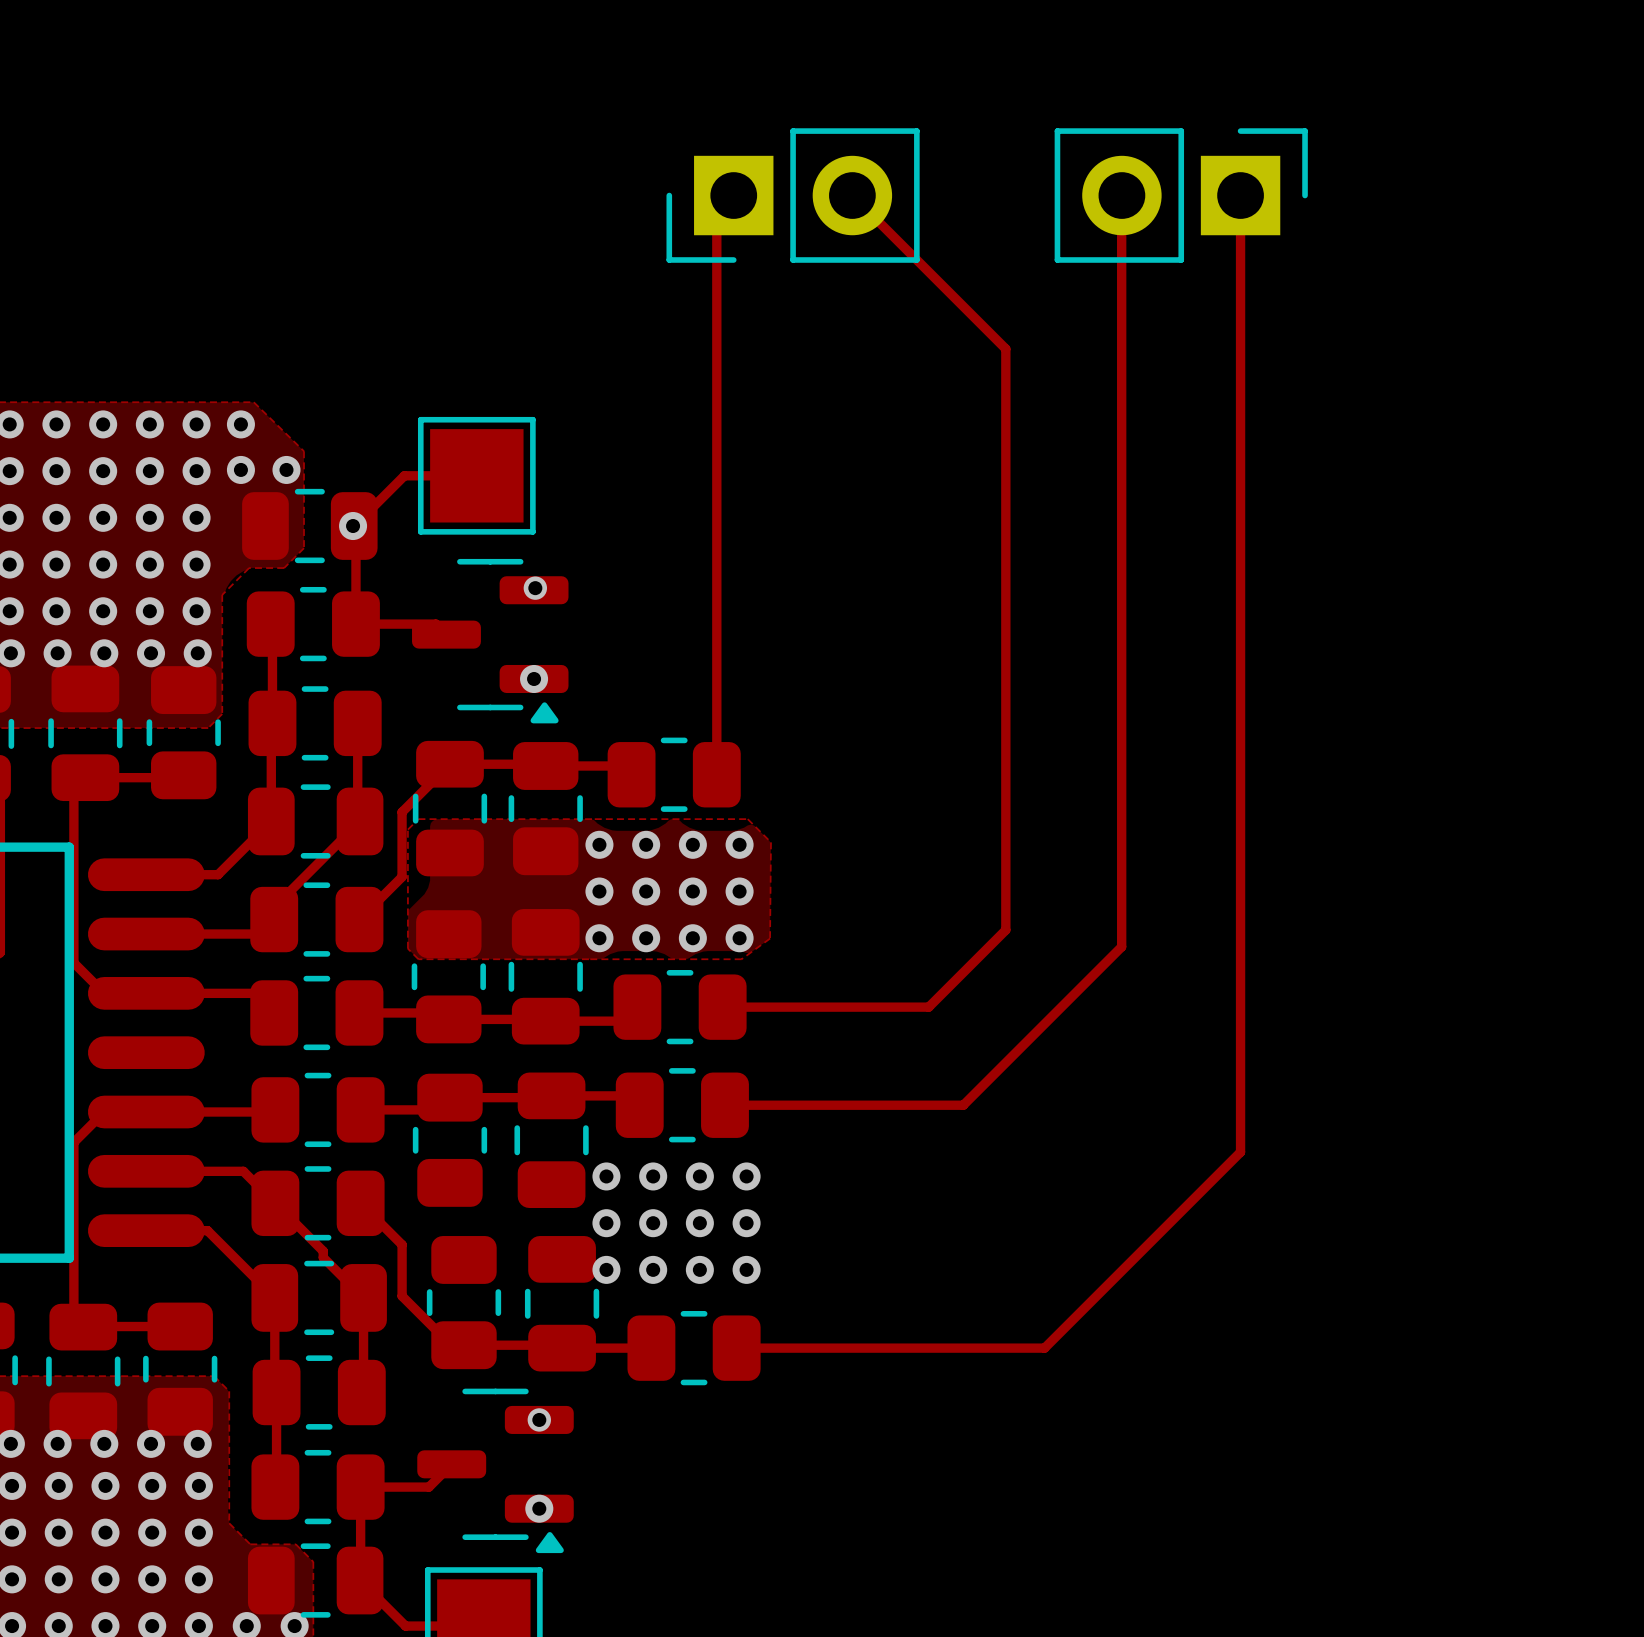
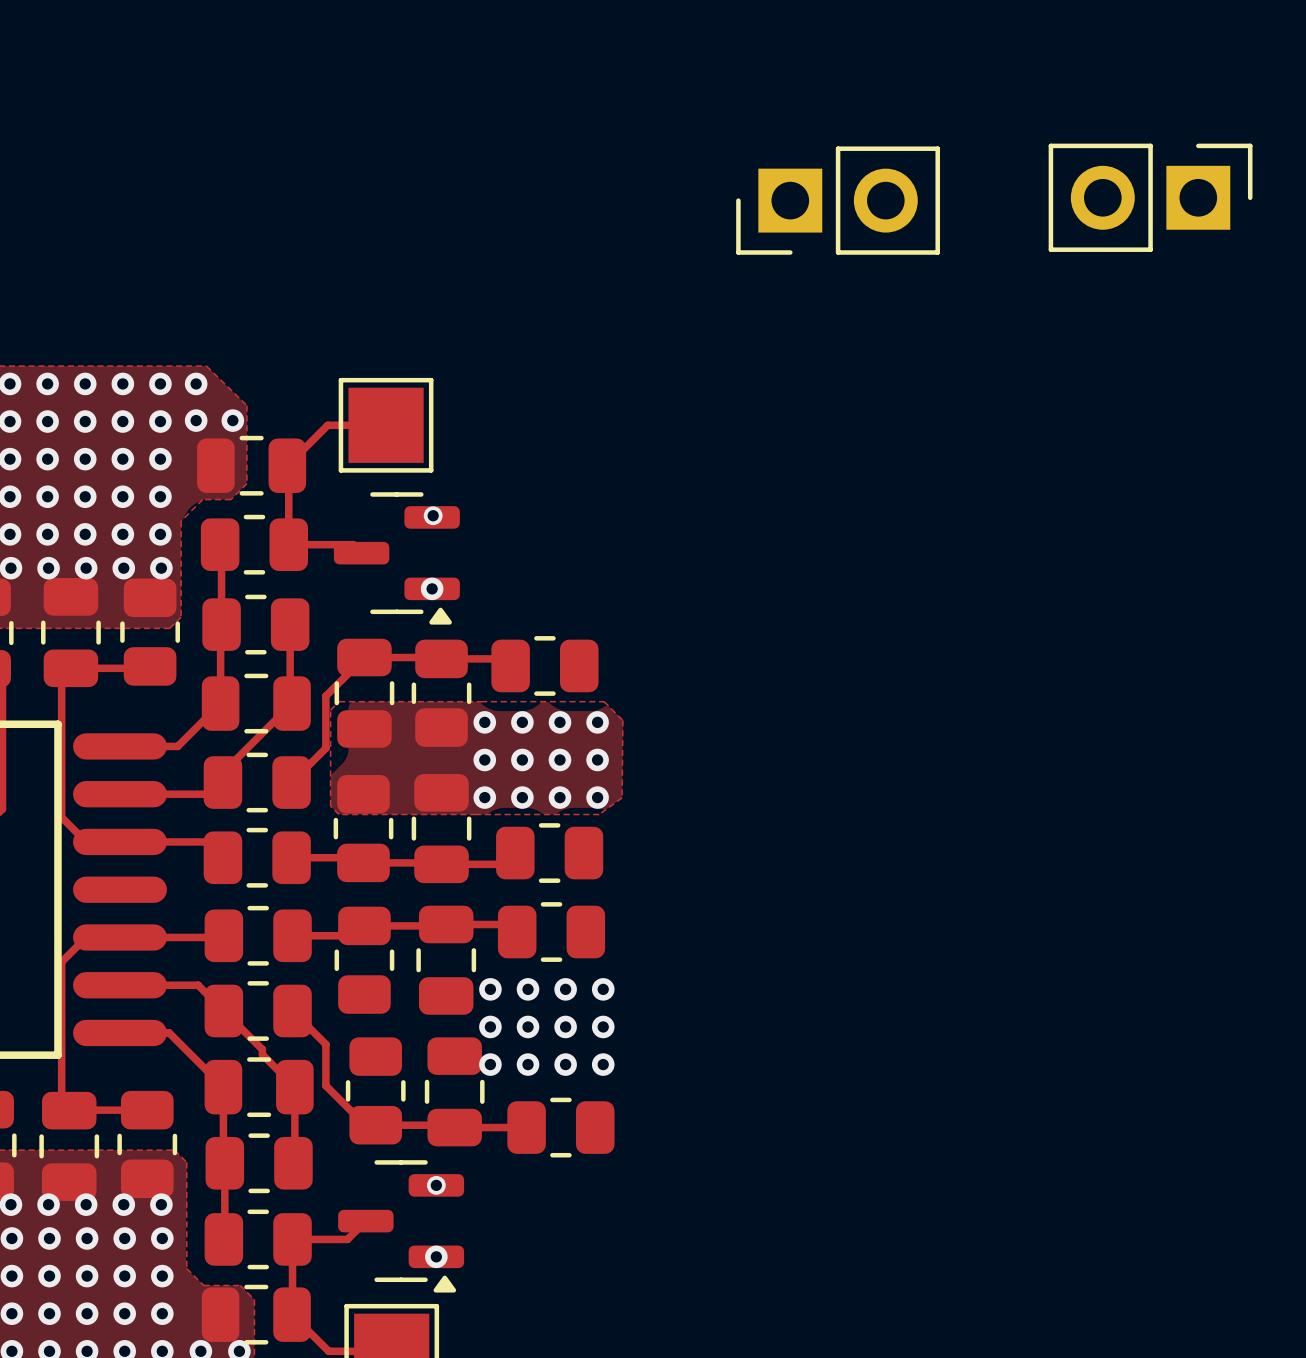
part: none -> (1150, 197)
track: (733, 195) (716, 212) (716, 774) -> none
part: (793, 195) -> none
track: (852, 195) (1005, 348) (1005, 930) (928, 1007) (722, 1007) -> none
track: (1121, 195) (1121, 946) (963, 1105) (724, 1105) -> none
part: (1181, 195) -> none
track: (1240, 195) (1240, 1152) (1044, 1348) (736, 1348) -> none
part: none -> (838, 200)
via: (353, 526) -> none

